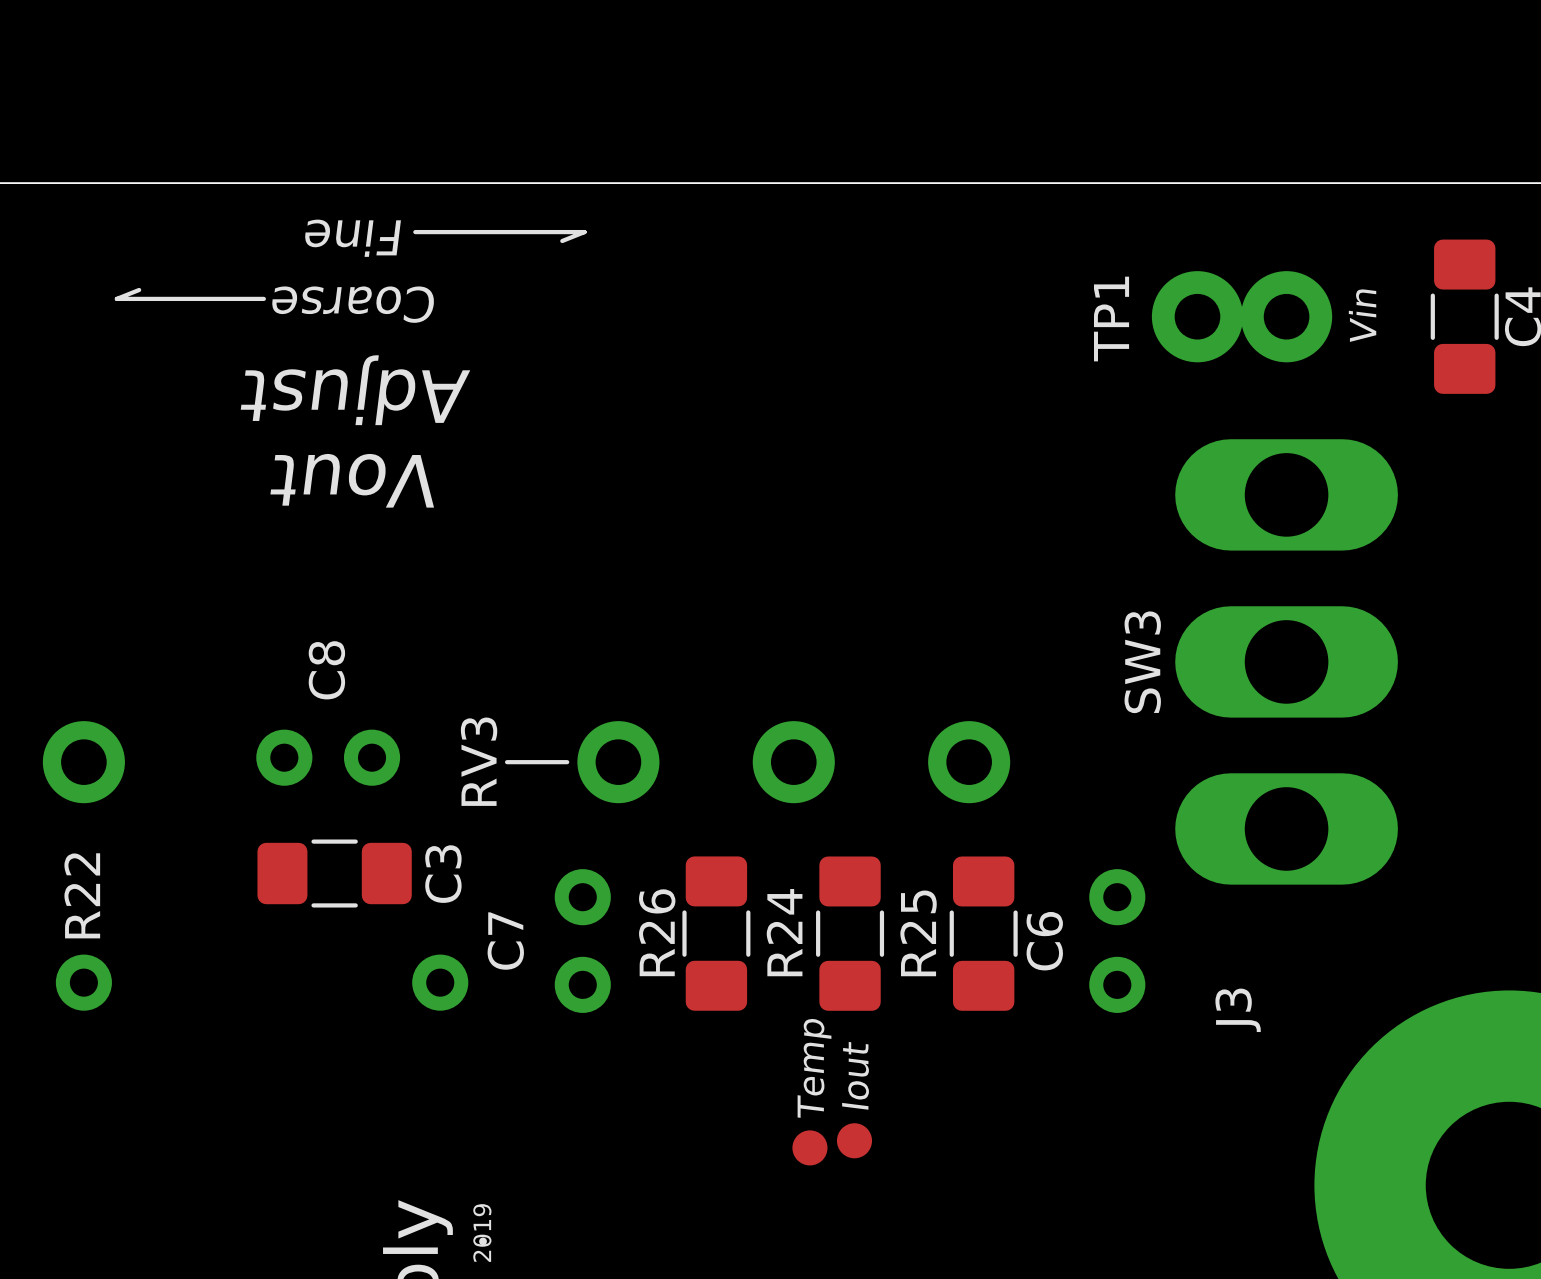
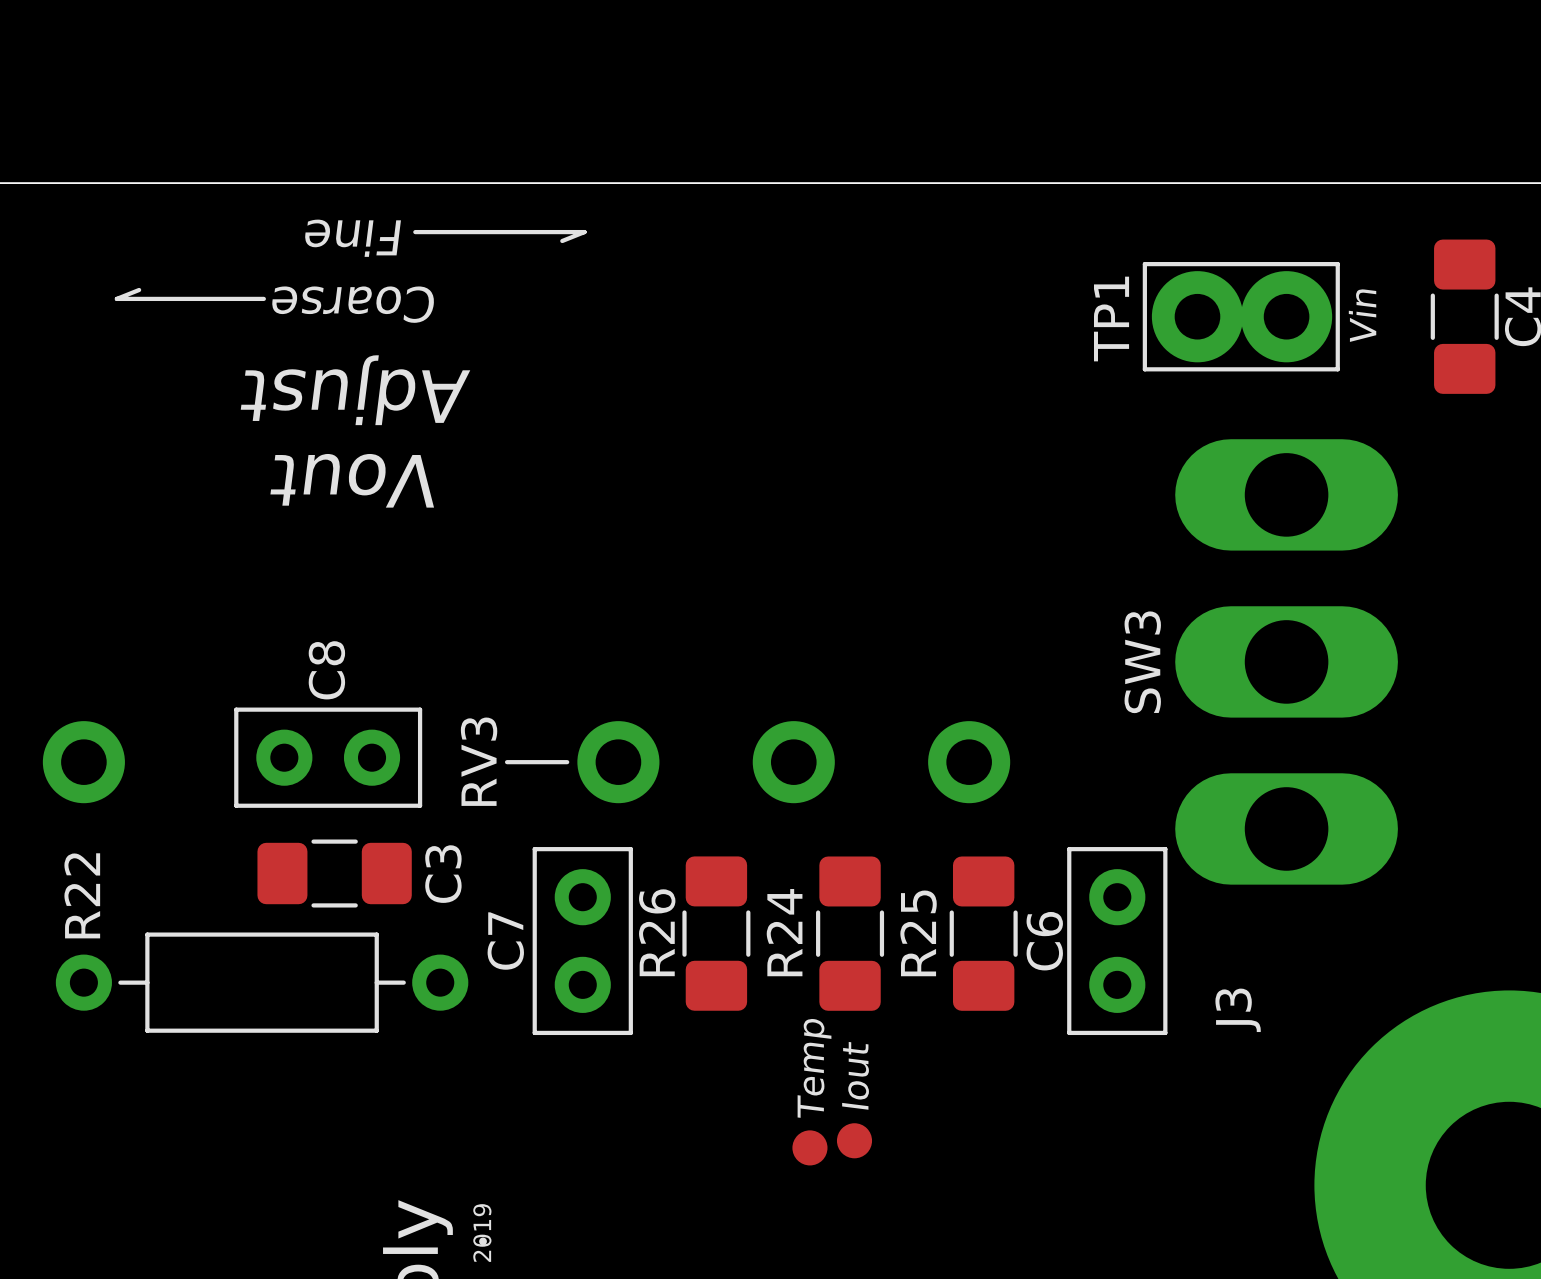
TP1 footprint: [1151, 271, 1333, 363] -> [1142, 262, 1340, 372]
C8 footprint: [256, 729, 401, 786] -> [234, 707, 423, 808]
C7 footprint: [554, 869, 611, 1013] -> [532, 847, 633, 1036]
C6 footprint: [1089, 869, 1146, 1013] -> [1067, 847, 1168, 1036]
R22 footprint: [55, 954, 469, 1011] -> [55, 932, 469, 1033]

